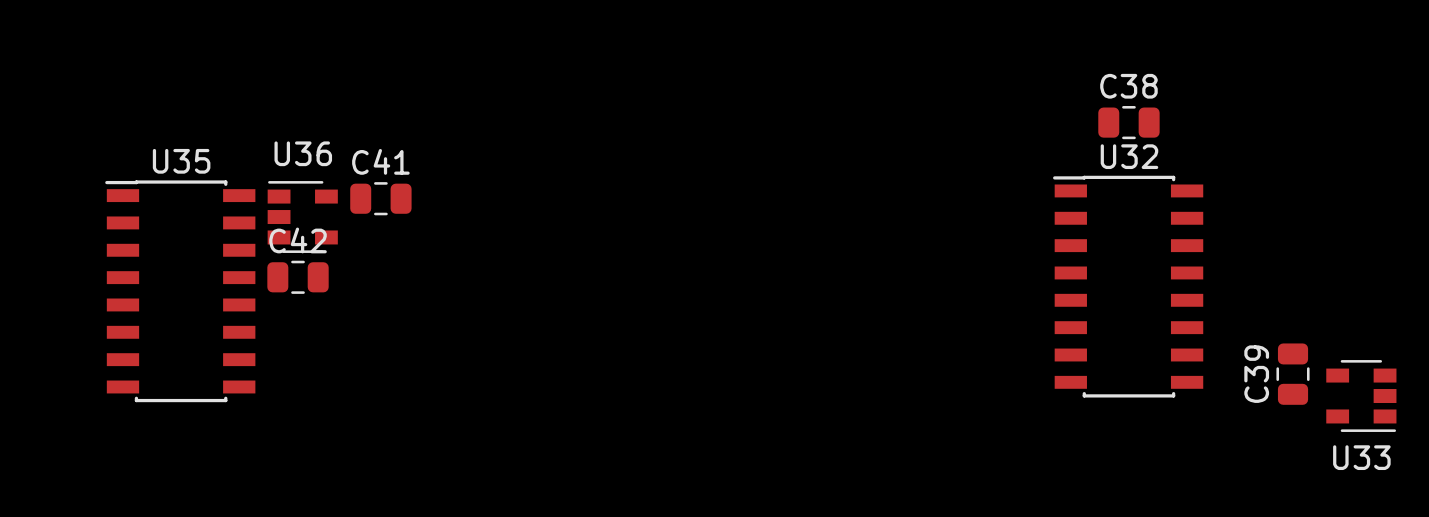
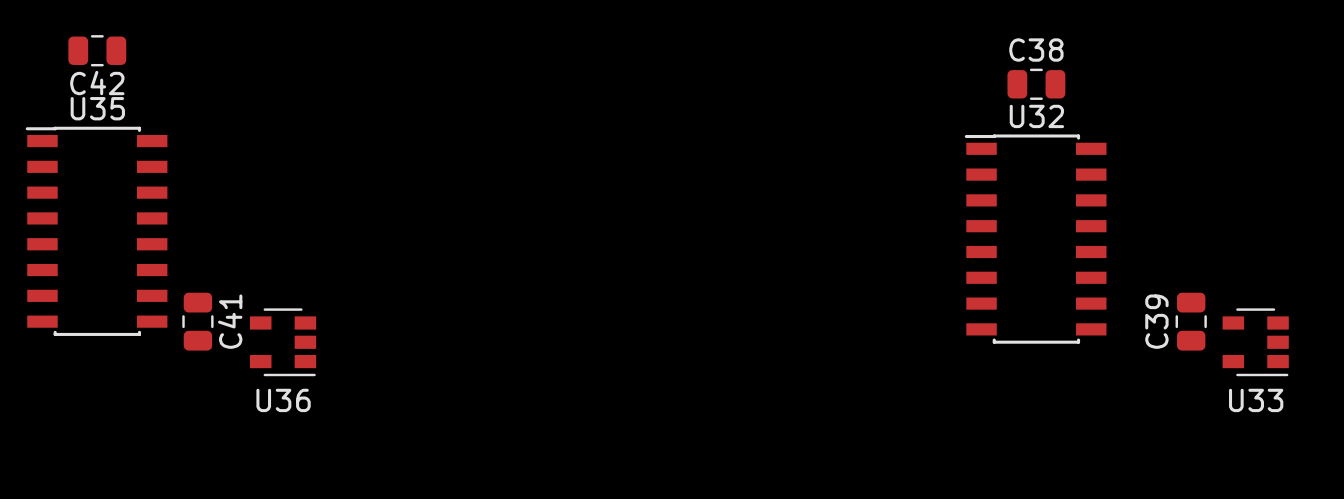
C41 rotation: 0° (380, 198) -> 90° clockwise (197, 321)
C41 position: (380, 198) -> (197, 321)
U36 rotation: 0° (302, 217) -> 180° (283, 342)
U36 position: (302, 217) -> (283, 342)
C42 name position: C42 (298, 240) -> C42 (97, 83)
C42 position: (298, 277) -> (97, 50)
U35 position: (180, 291) -> (96, 231)

